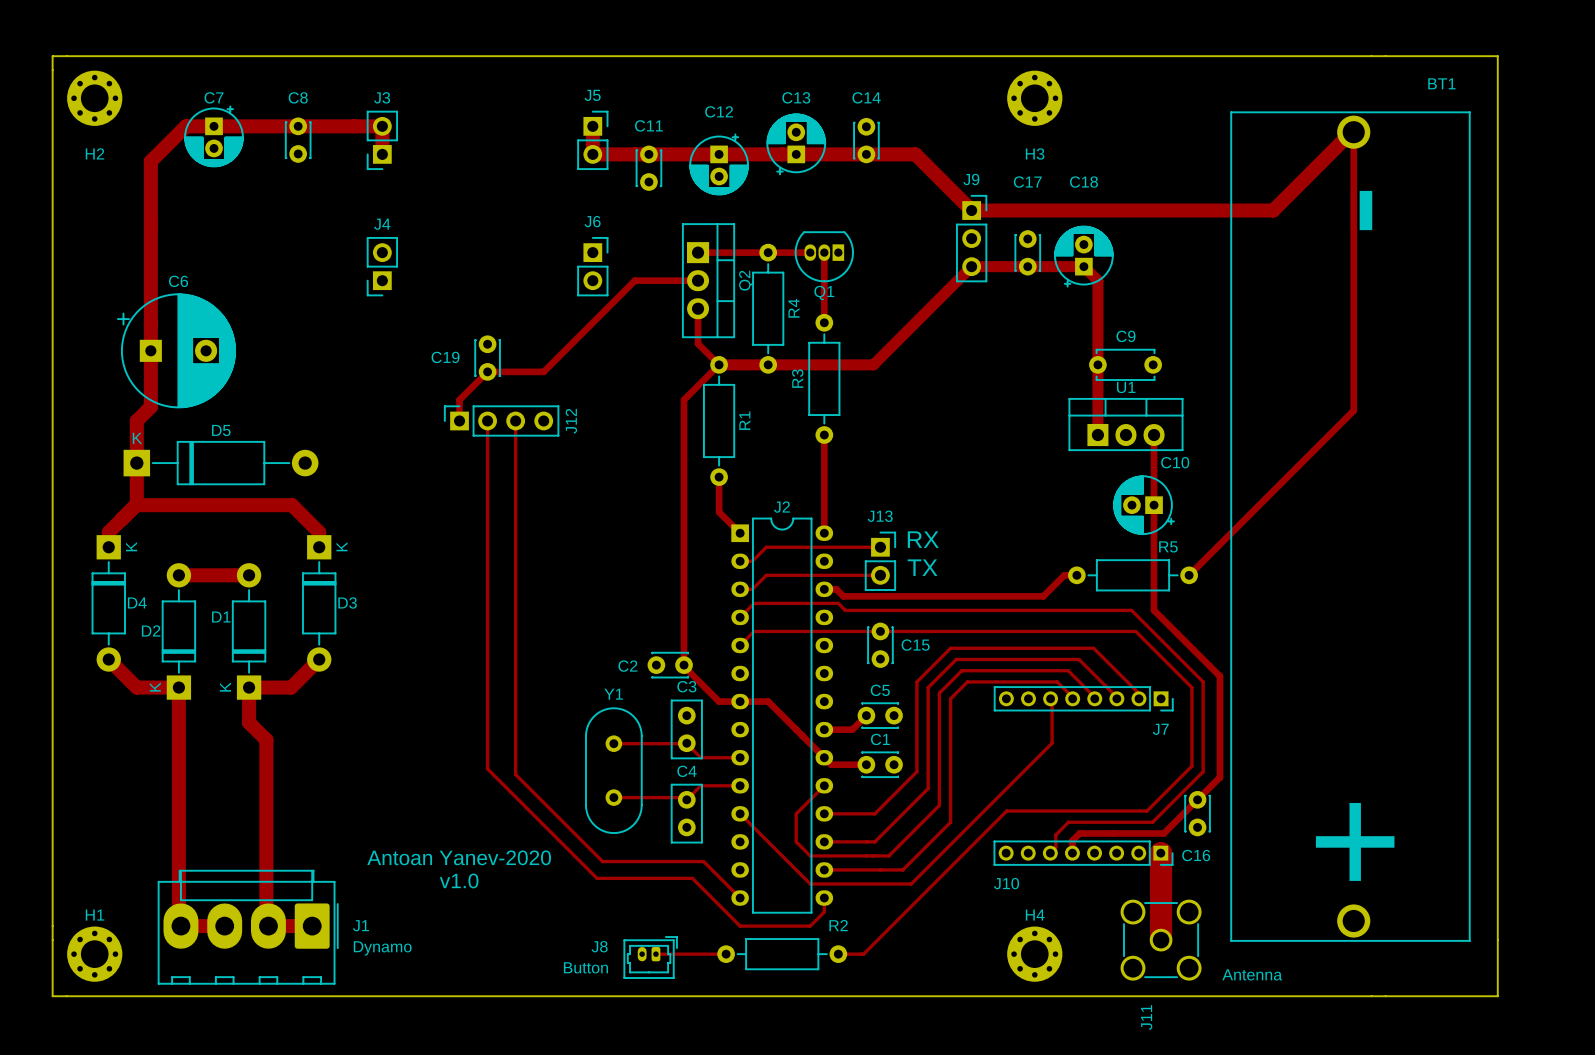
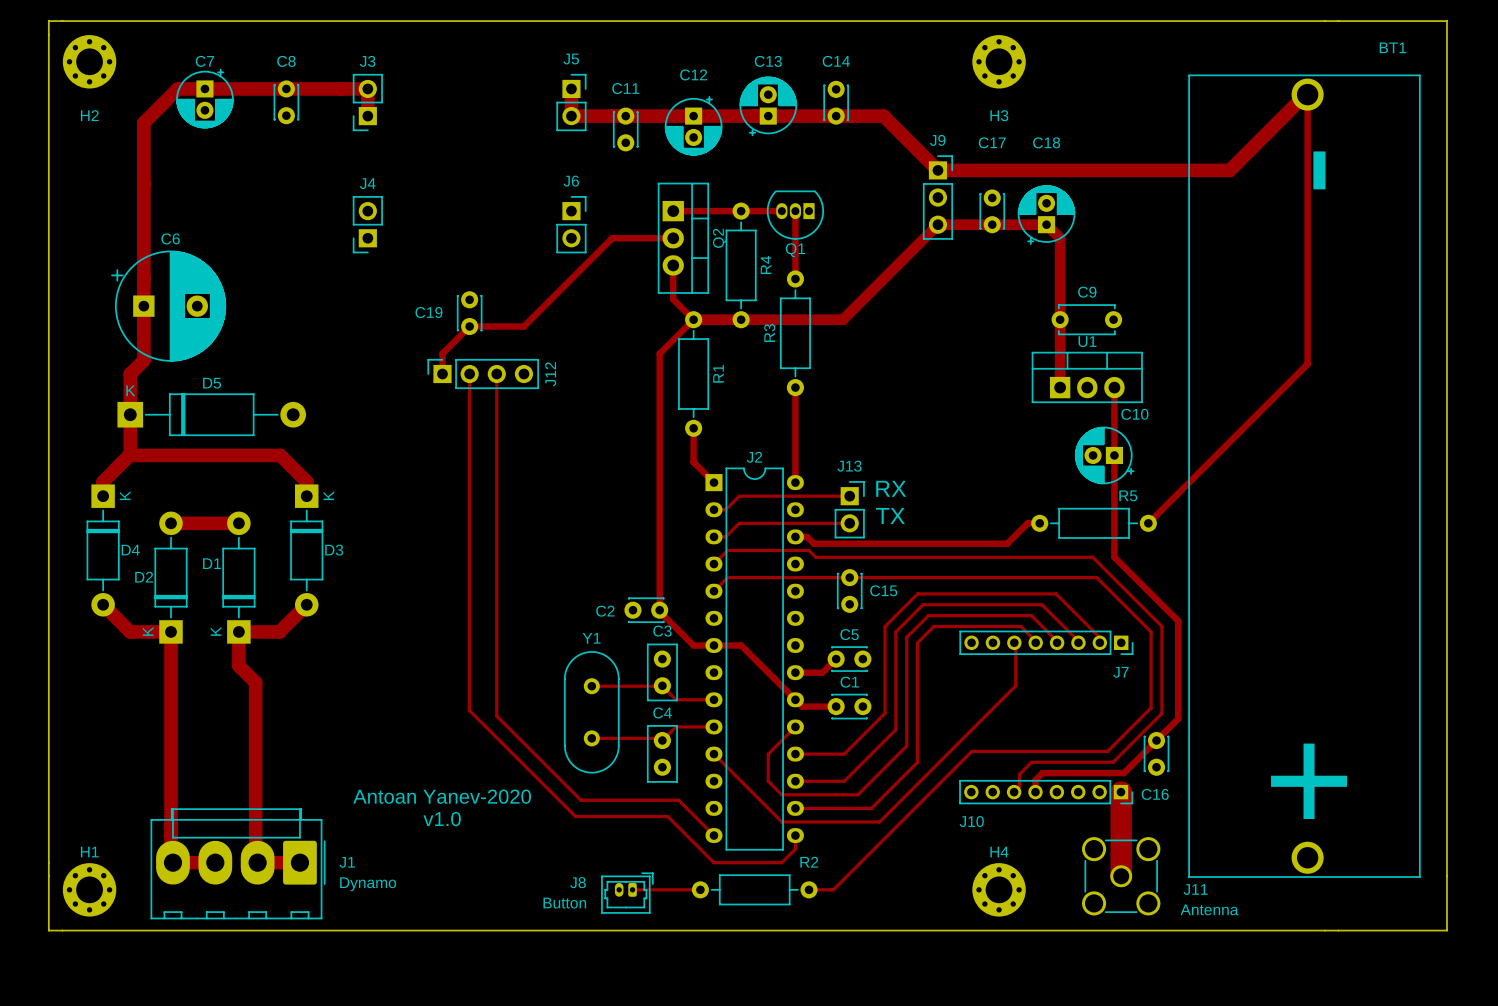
J11 name rotation: 0° (1146, 1017) -> 90° clockwise (1195, 889)
J11 name position: J11 (1146, 1017) -> J11 (1195, 889)

